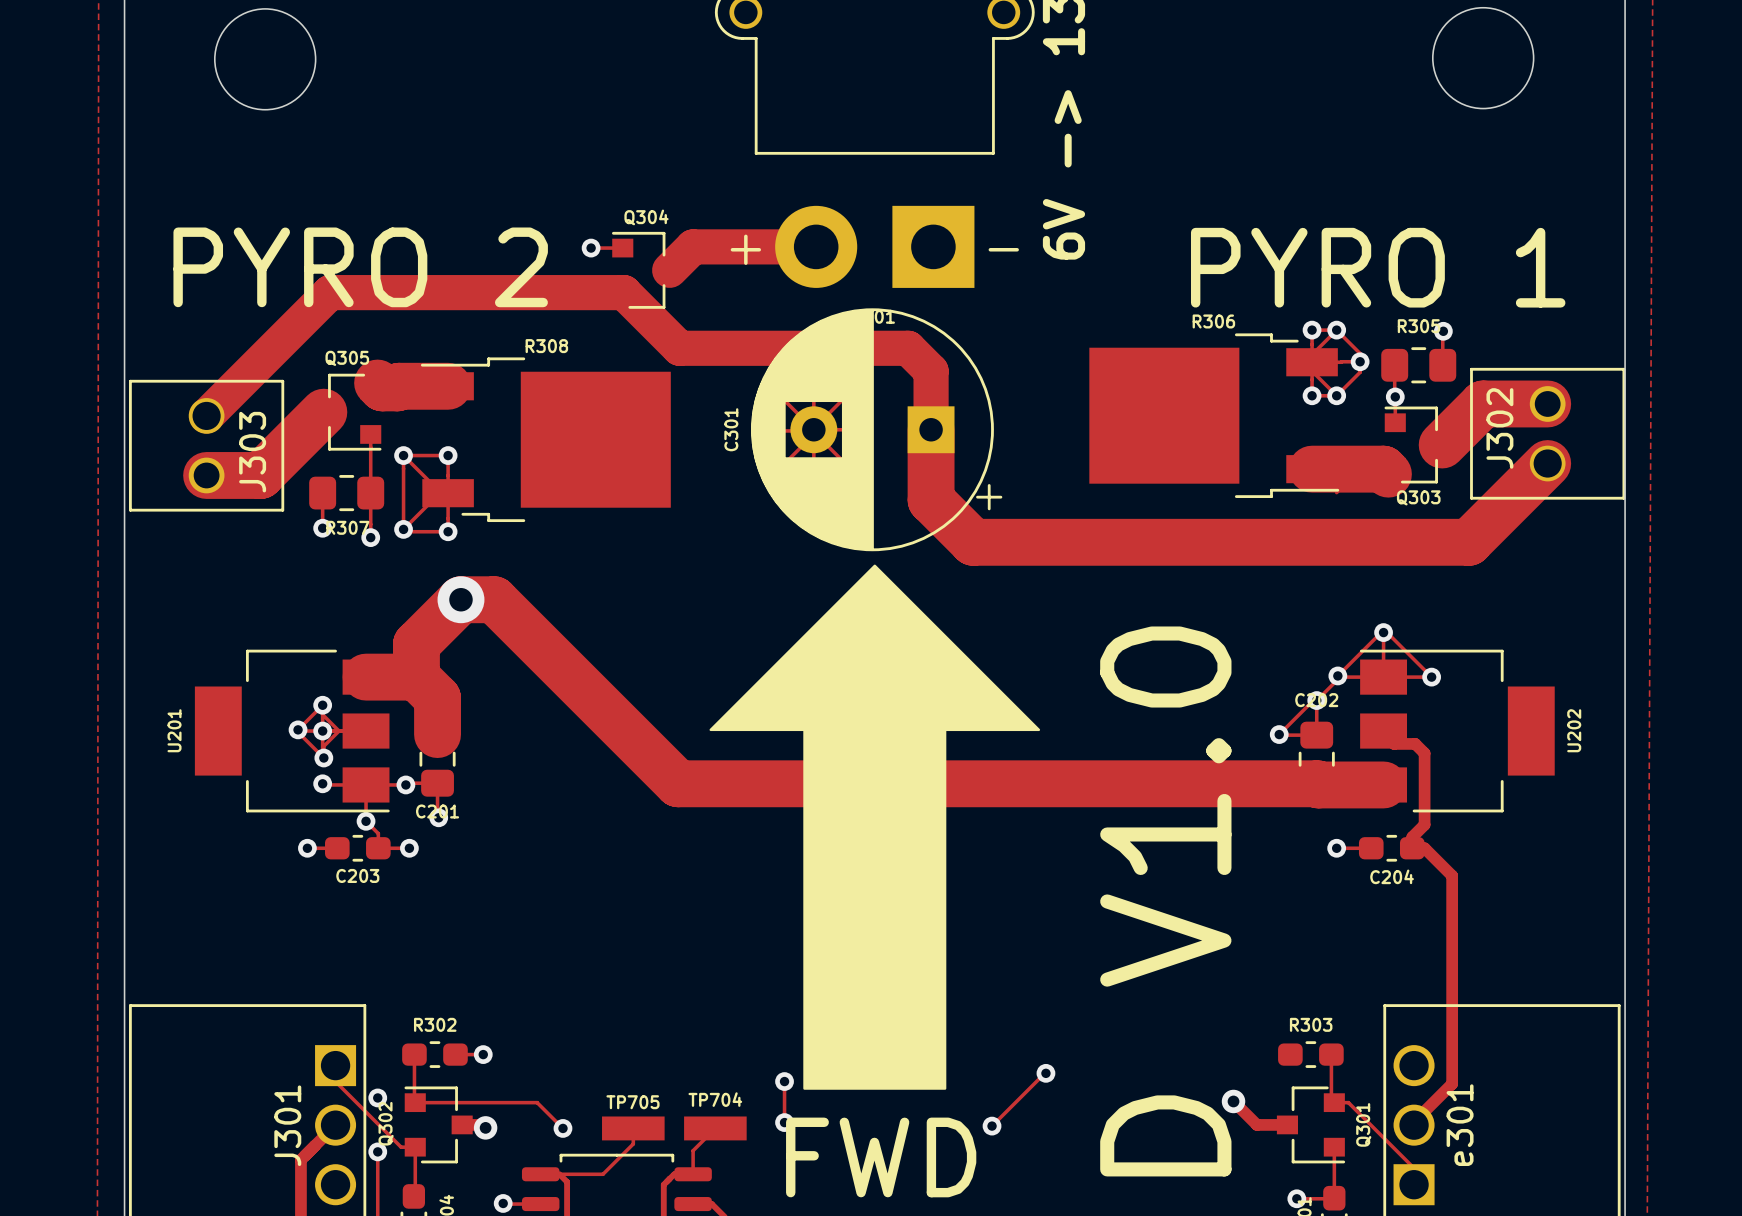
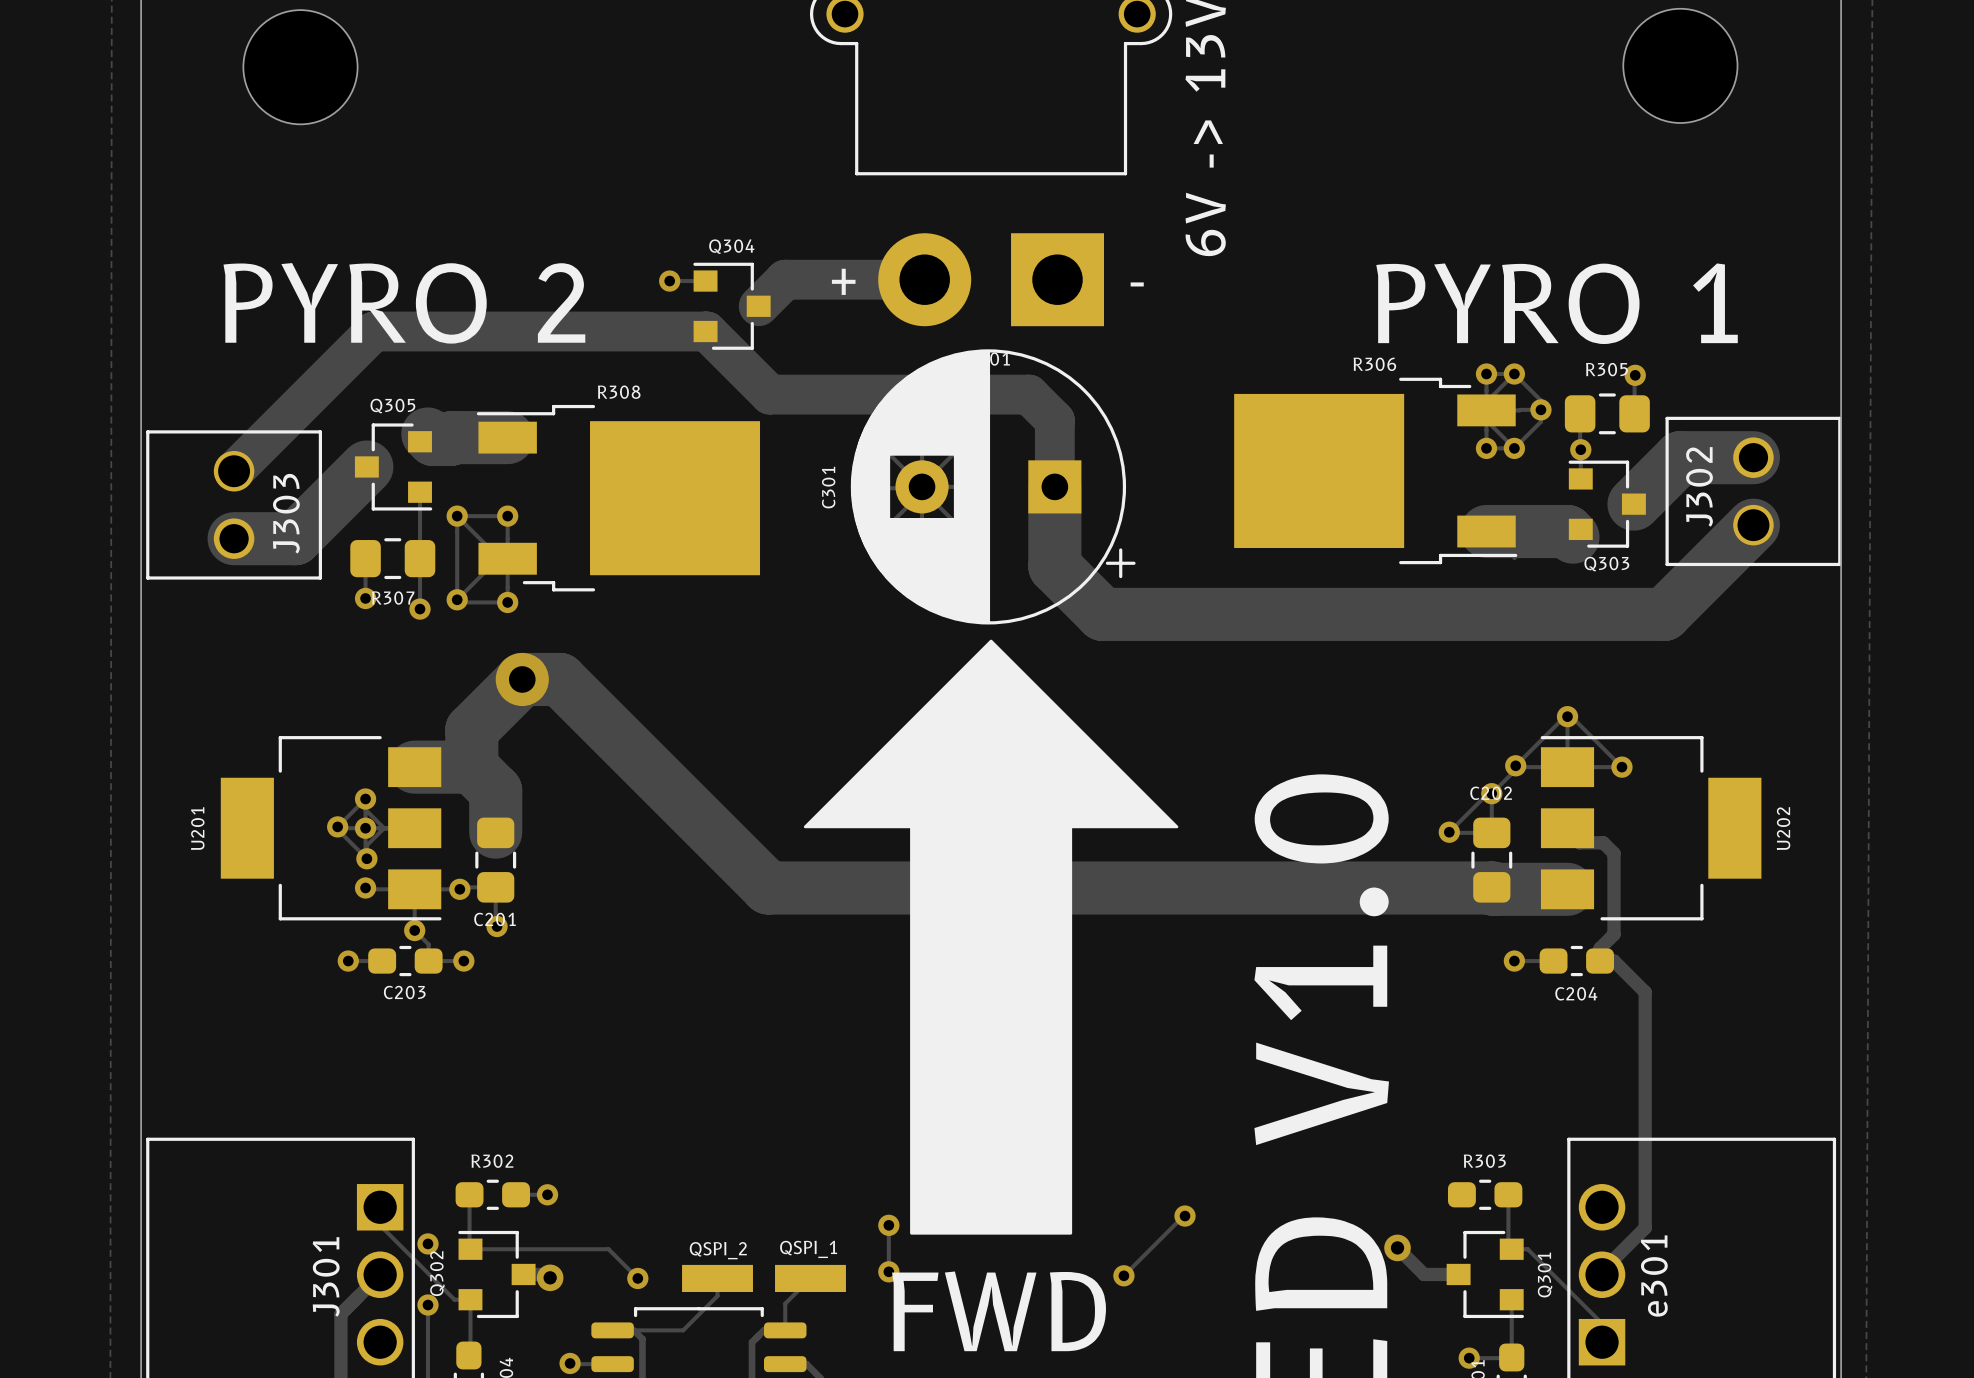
TP704 name: TP704 (715, 1099) -> none
text: none -> QSPI_1 (808, 1249)
TP705 name: TP705 (632, 1102) -> none
text: none -> QSPI_2 (718, 1250)

